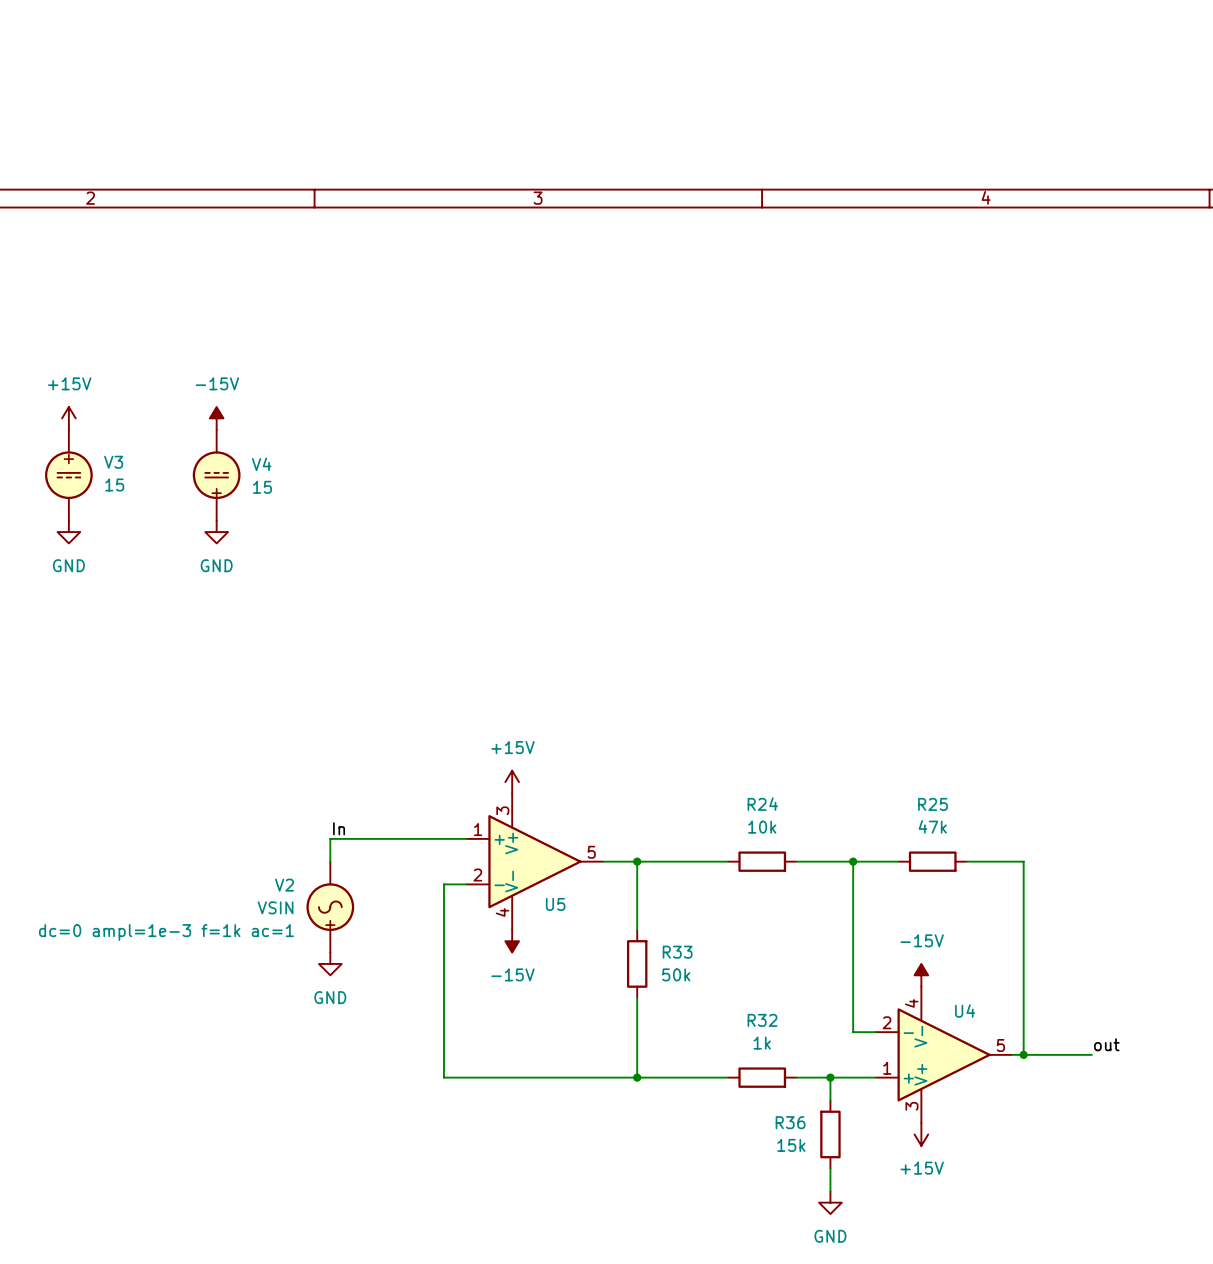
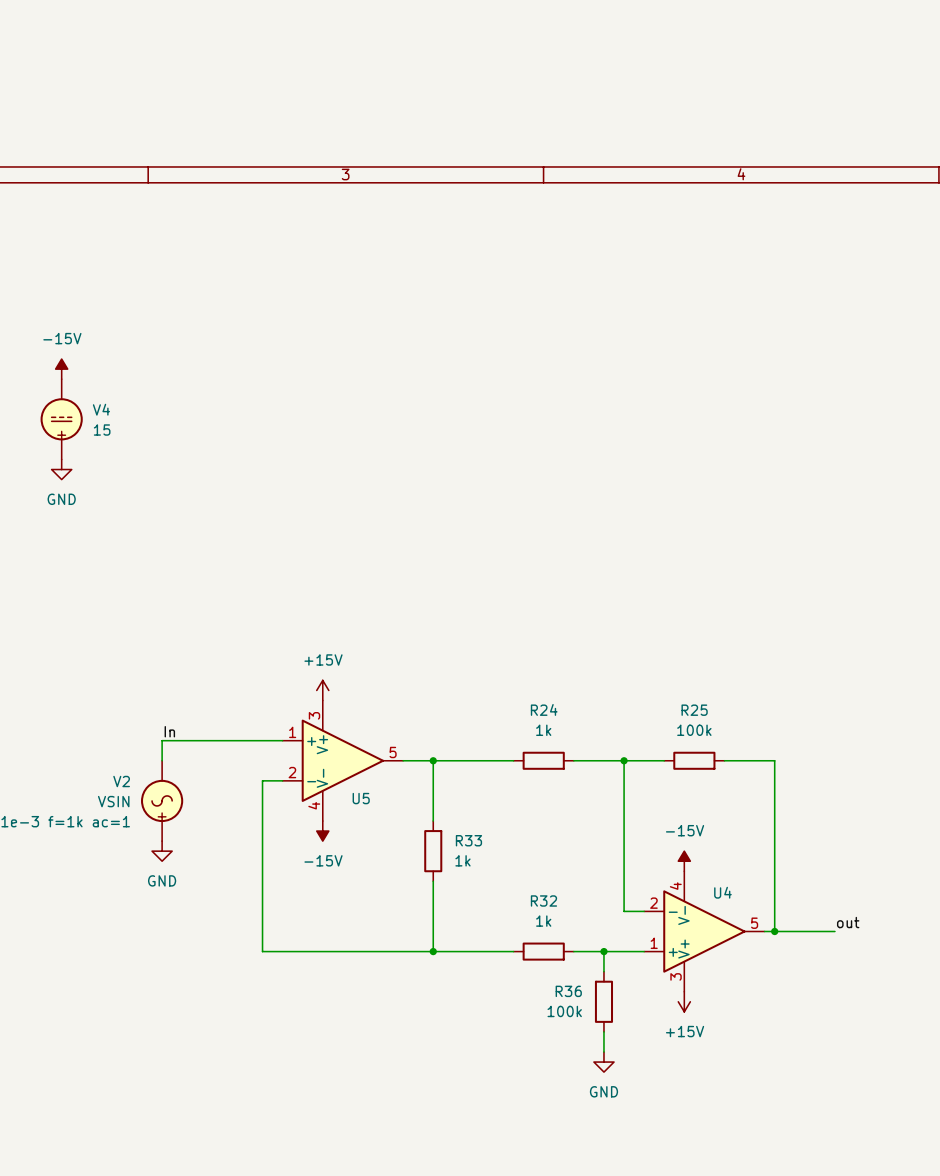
R25 value: 47k (932, 826) -> 100k (694, 730)
R24 value: 10k (762, 827) -> 1k (543, 730)
R33 value: 50k (676, 974) -> 1k (462, 860)
R36 value: 15k (791, 1145) -> 100k (564, 1011)

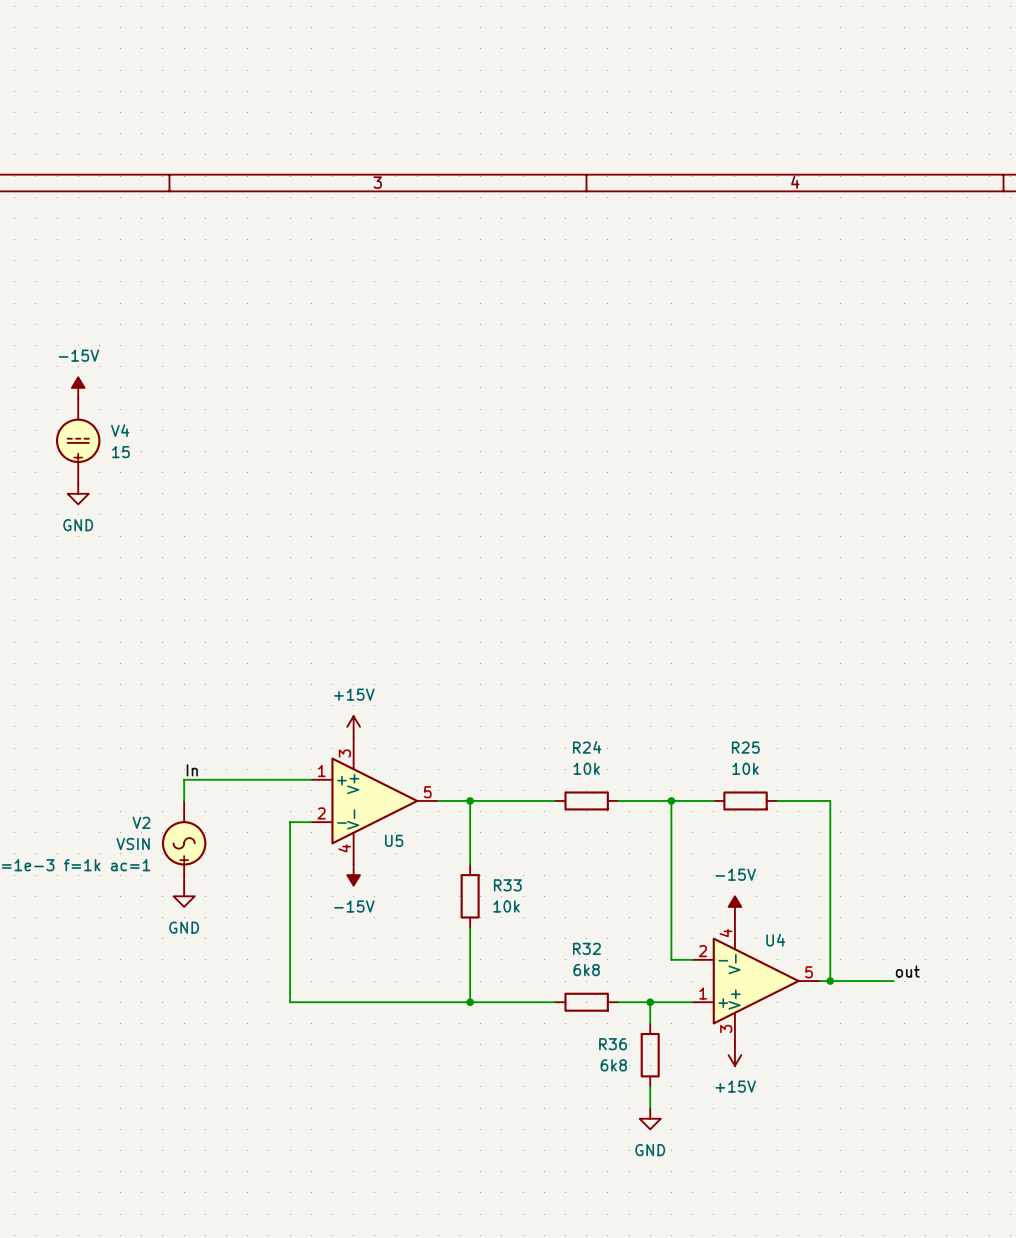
R24 value: 1k (543, 730) -> 10k (586, 768)
R25 value: 100k (694, 730) -> 10k (745, 768)
R33 value: 1k (462, 860) -> 10k (506, 906)
R32 value: 1k (543, 921) -> 6k8 (586, 970)
R36 value: 100k (564, 1011) -> 6k8 (613, 1065)

